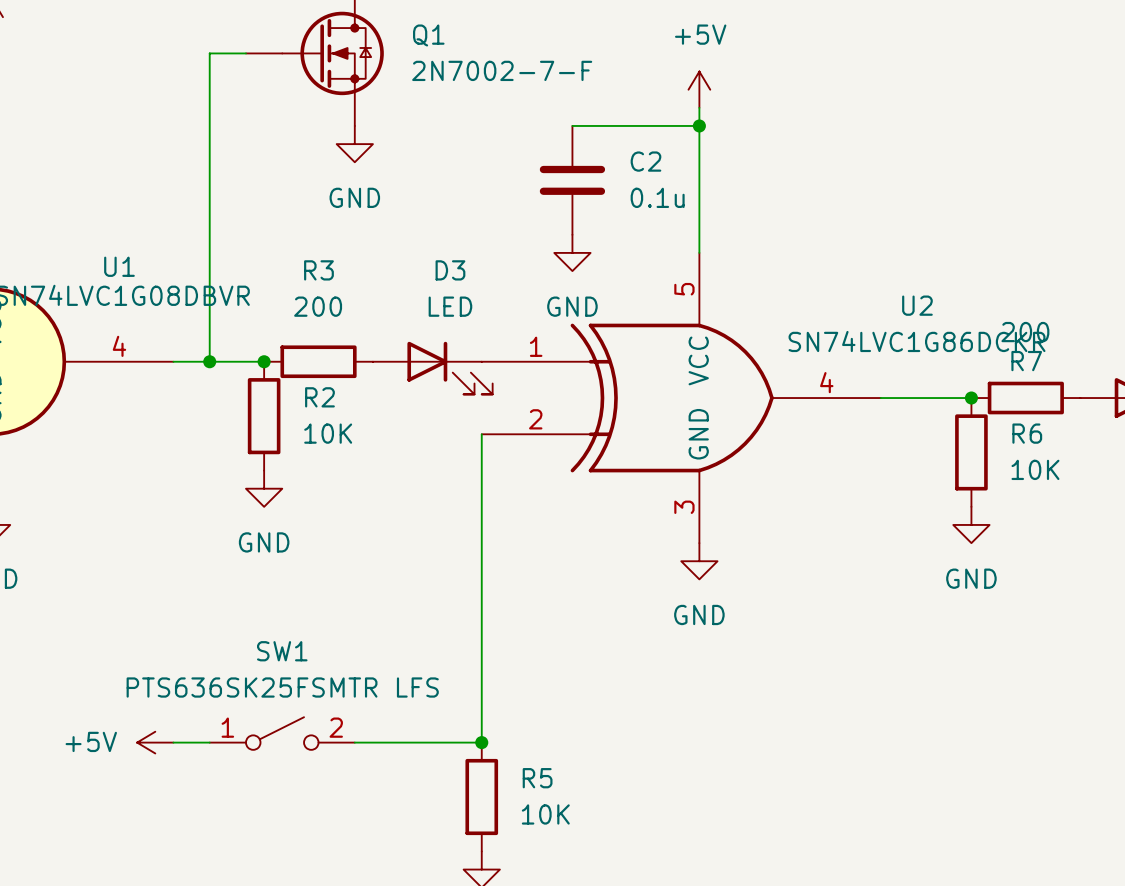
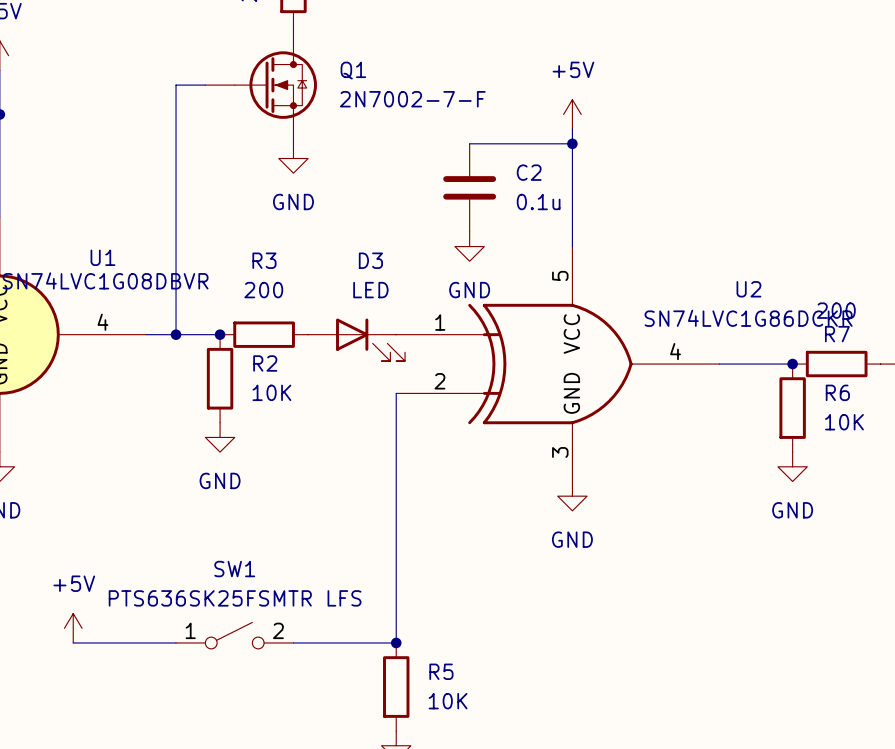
wire: none -> (73, 642) (146, 642)
power symbol rotation: 0° (155, 742) -> 90° clockwise (73, 628)
power symbol position: +5V (155, 742) -> +5V (73, 628)

